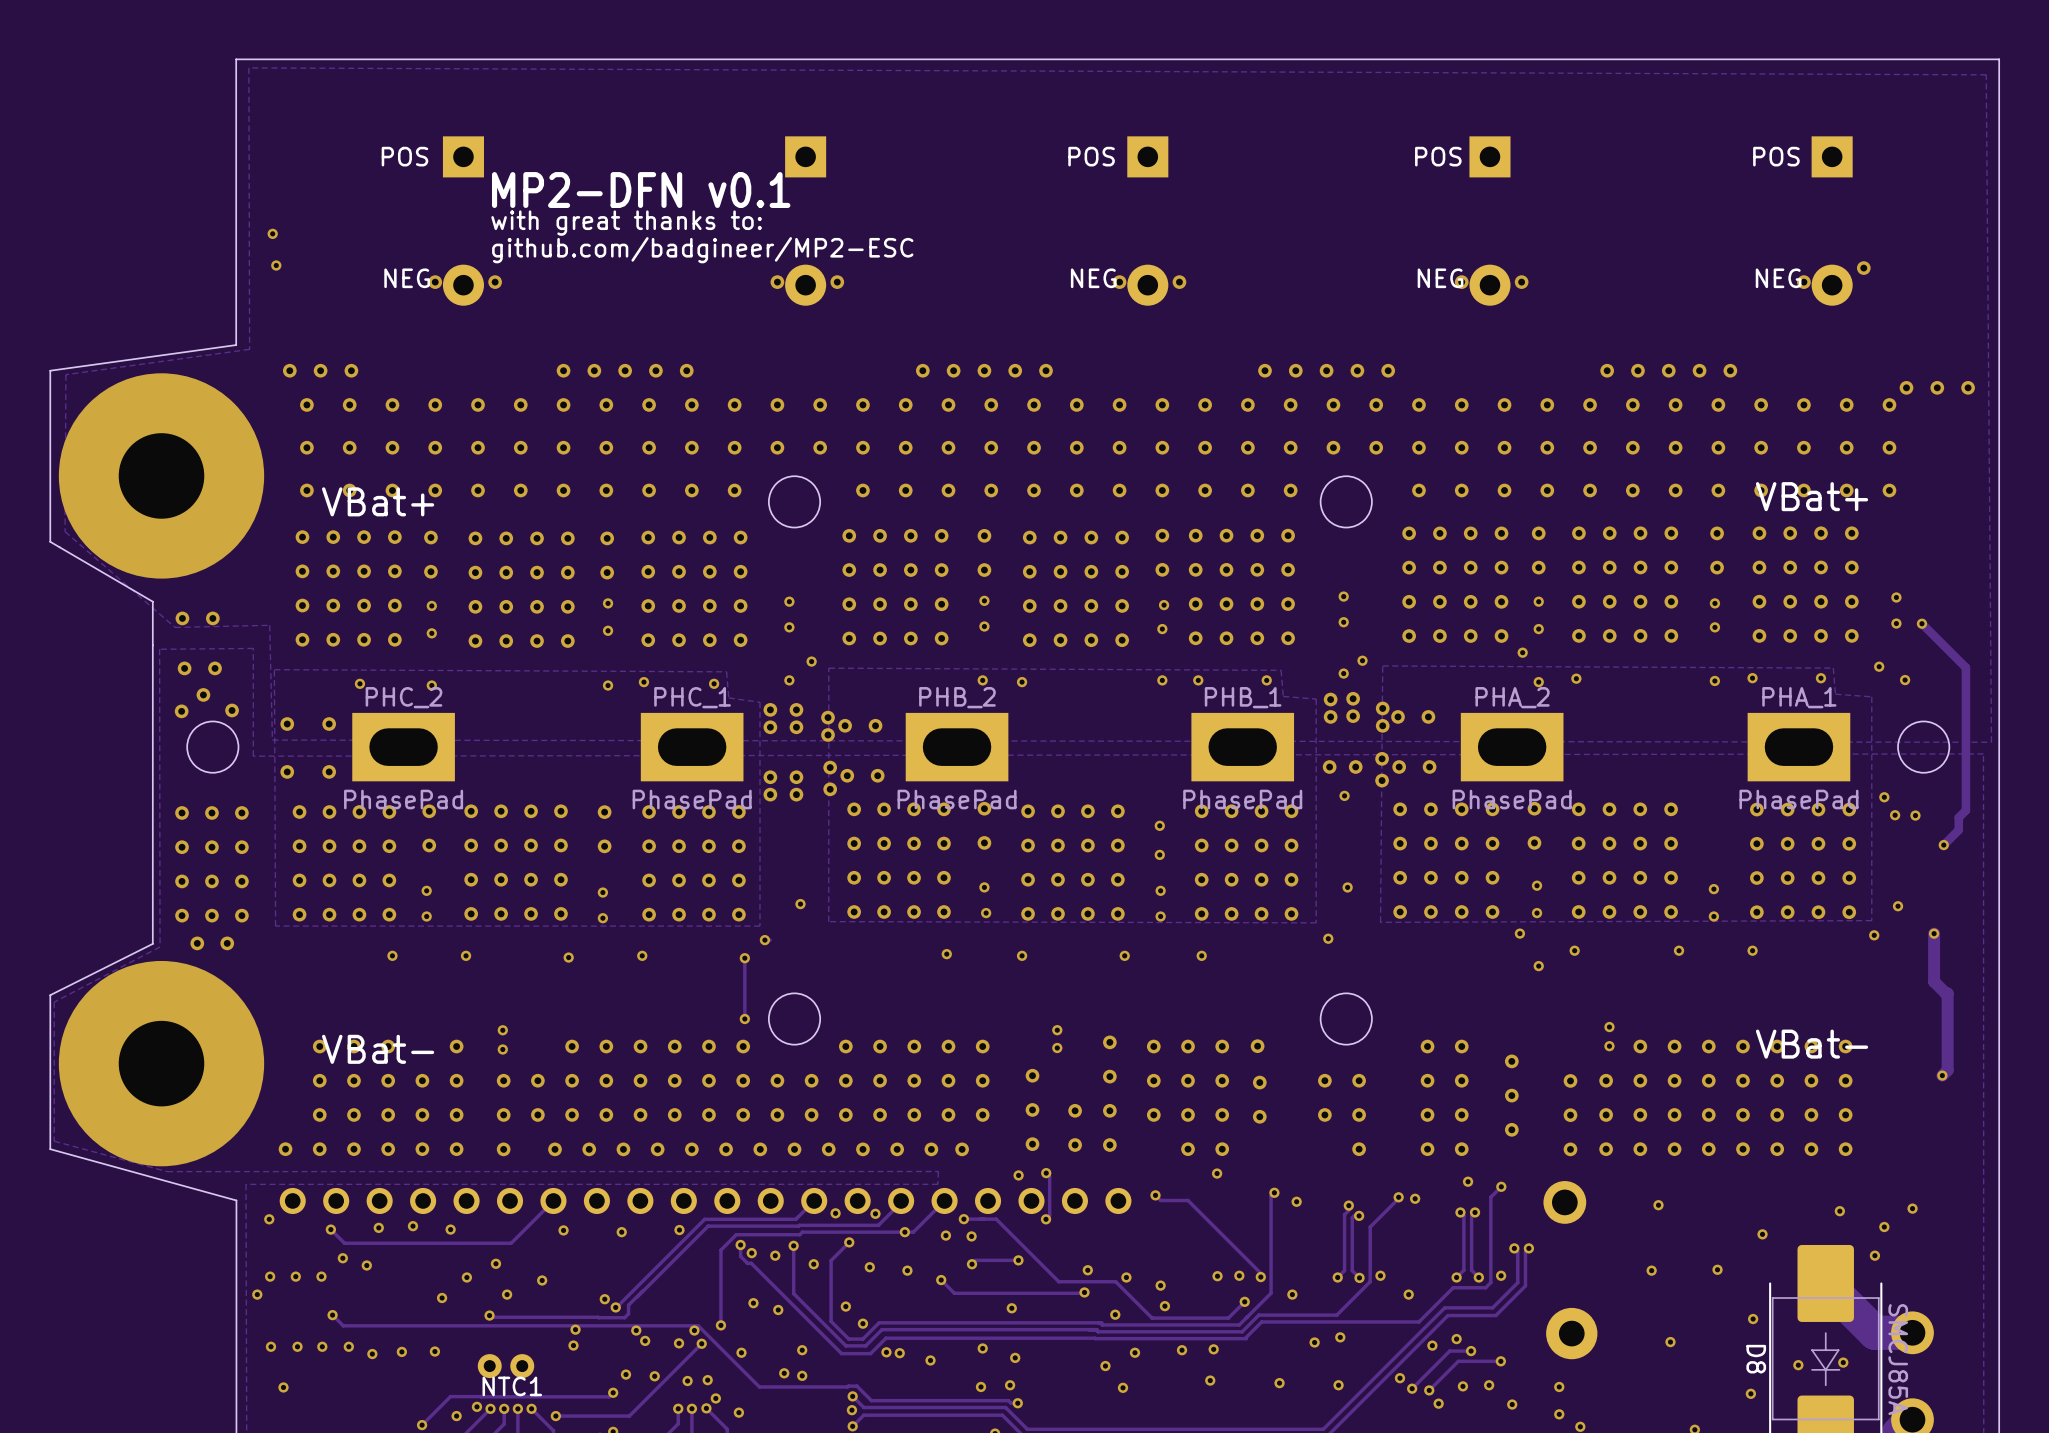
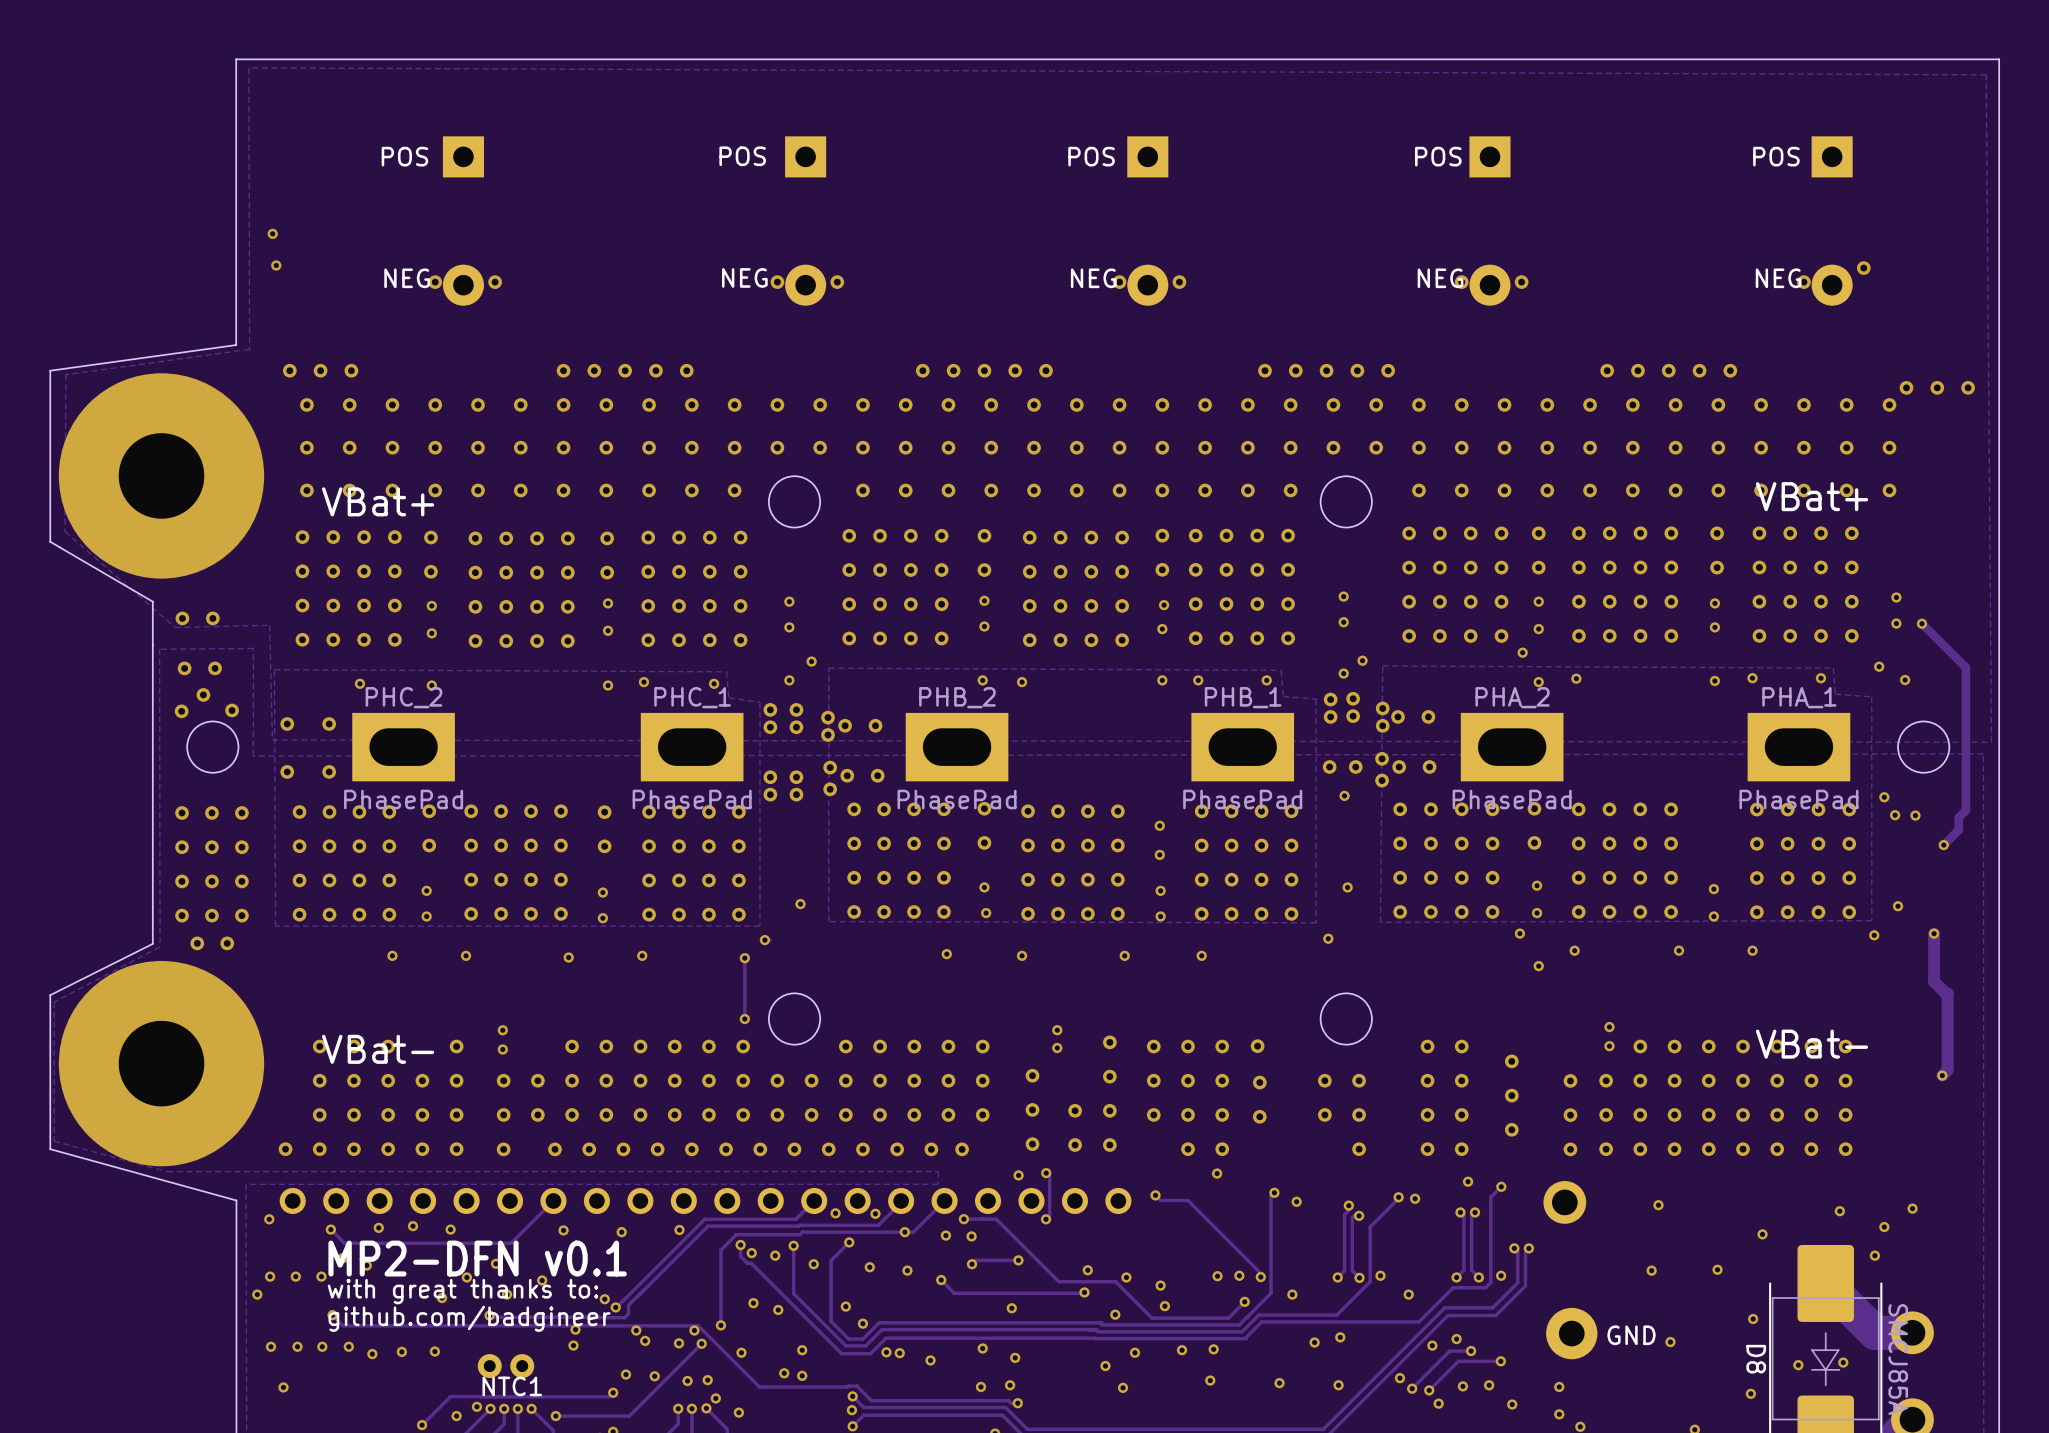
text: none -> POS (742, 156)
text: MP2-DFN v0.1 (641, 190) -> none
text: with great thanks to: (626, 223) -> none
text: github.com/badgineer/MP2-ESC (702, 250) -> none
text: none -> NEG (744, 277)
text: none -> MP2-DFN v0.1 (477, 1258)
text: none -> with great thanks to: (463, 1291)
text: none -> github.com/badgineer (469, 1318)
text: none -> GND (1631, 1335)

